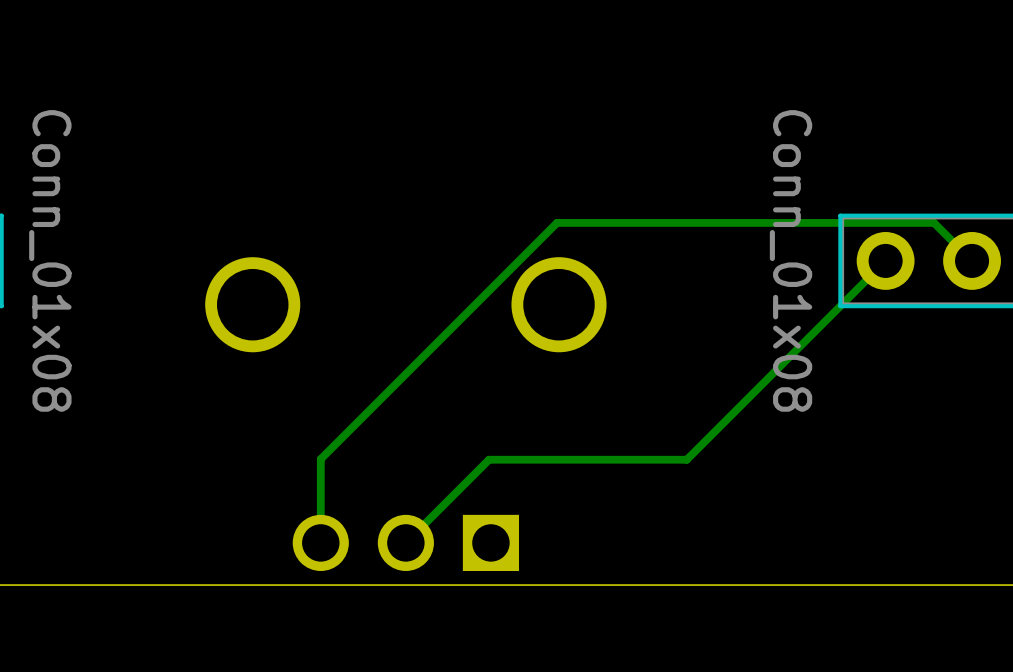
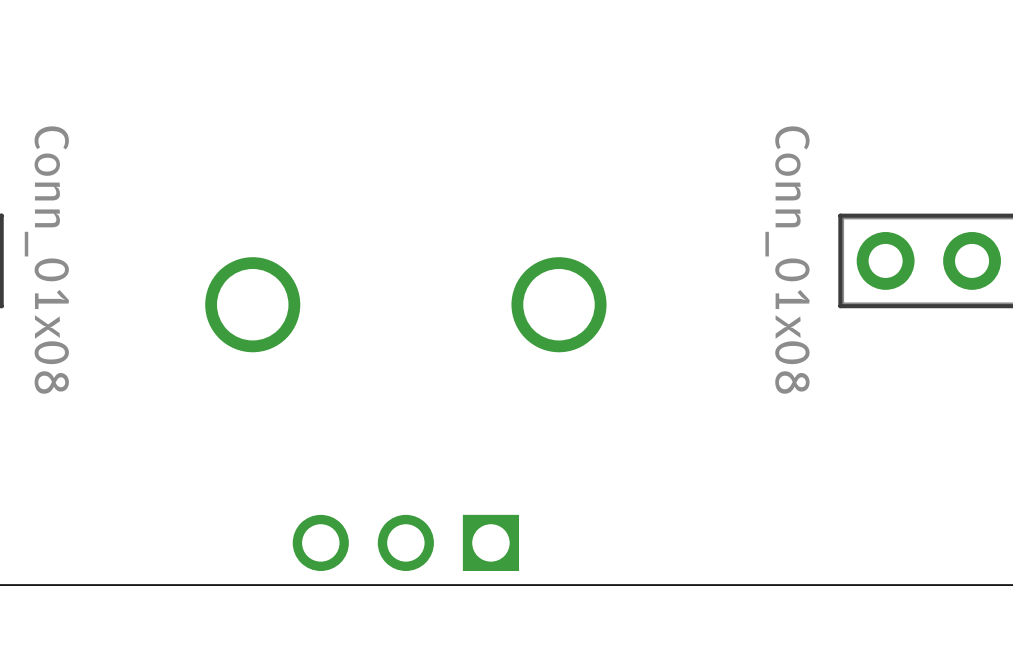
track: (885, 260) (686, 459) (489, 459) (405, 542) -> none
track: (972, 260) (934, 222) (557, 222) (320, 459) (320, 542) -> none

